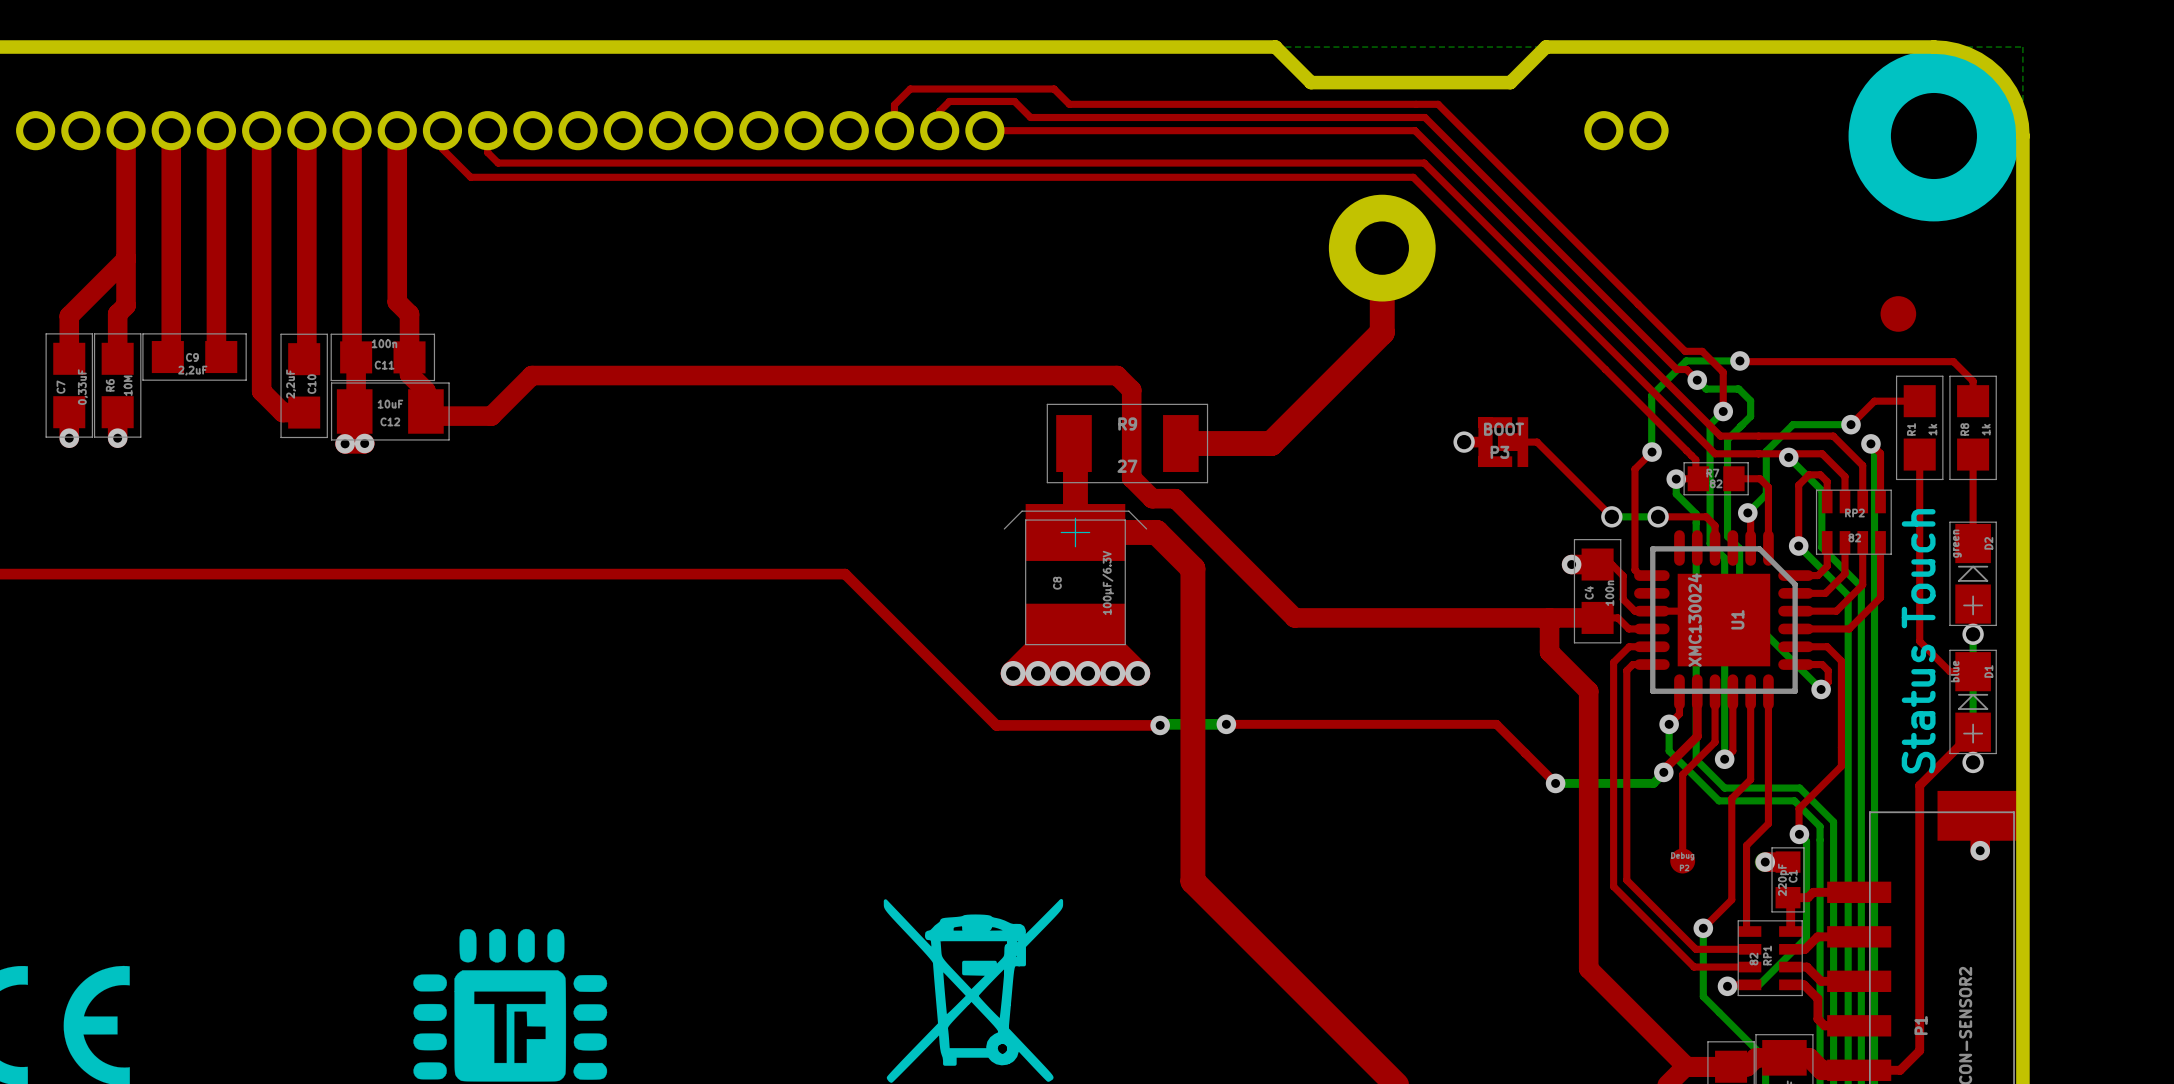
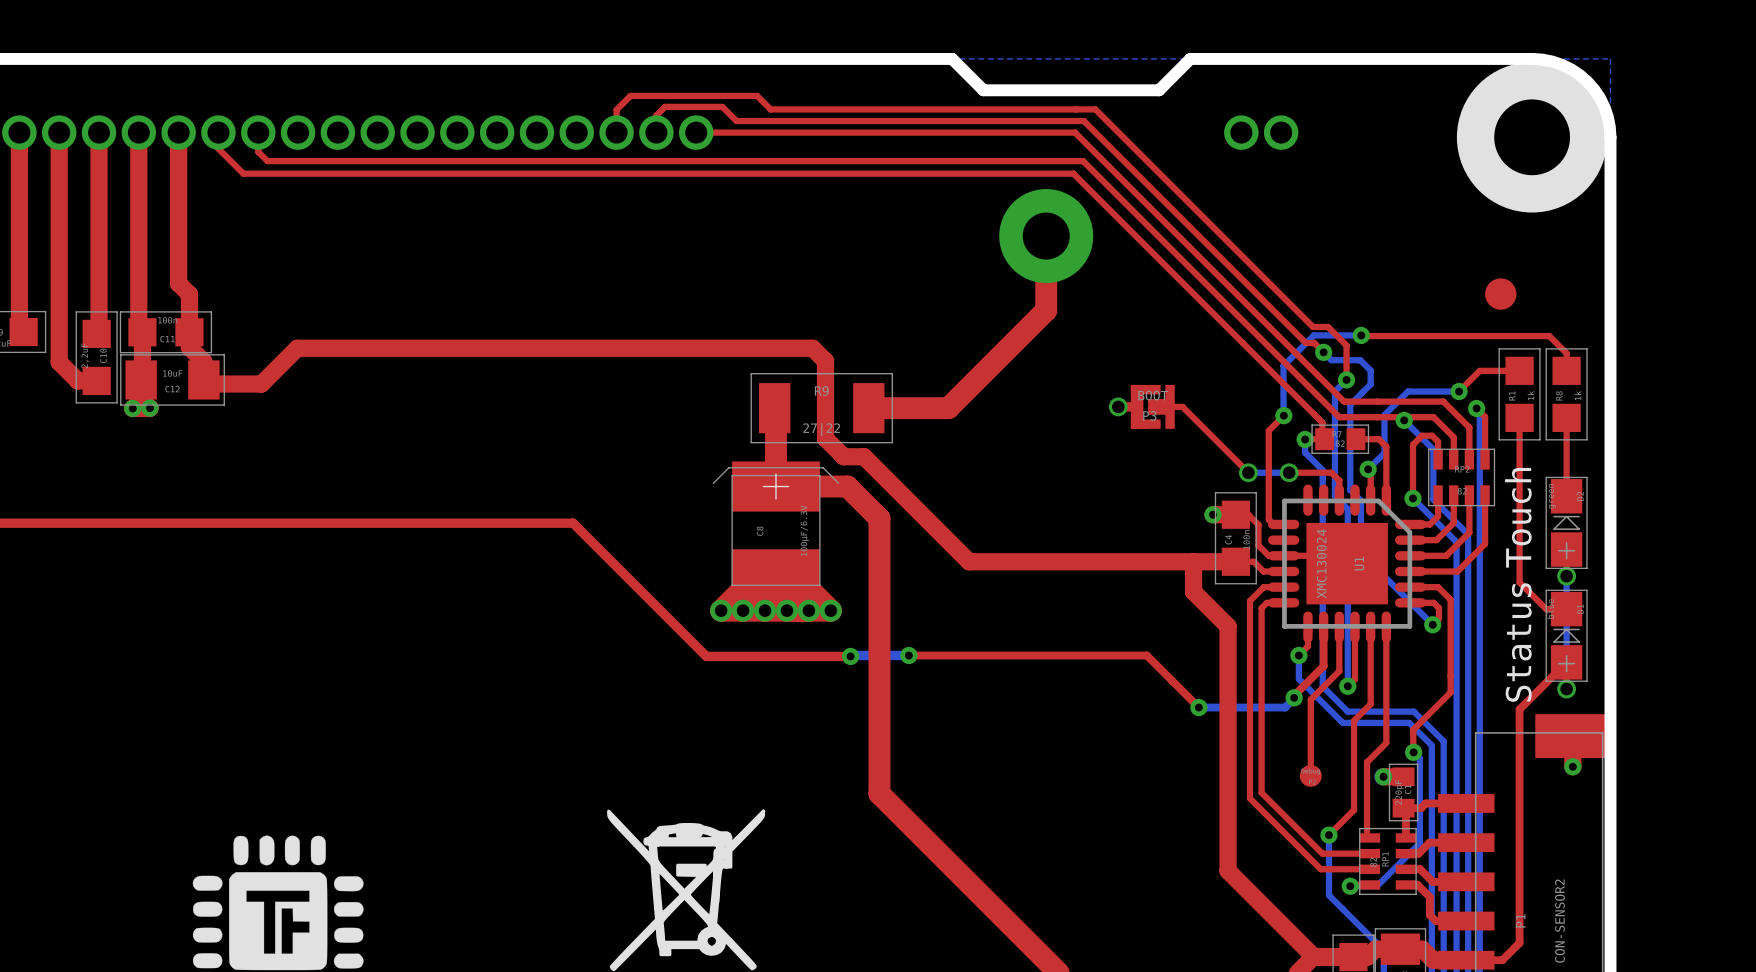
R9 value: 27 (1127, 466) -> 27|22 (821, 429)

